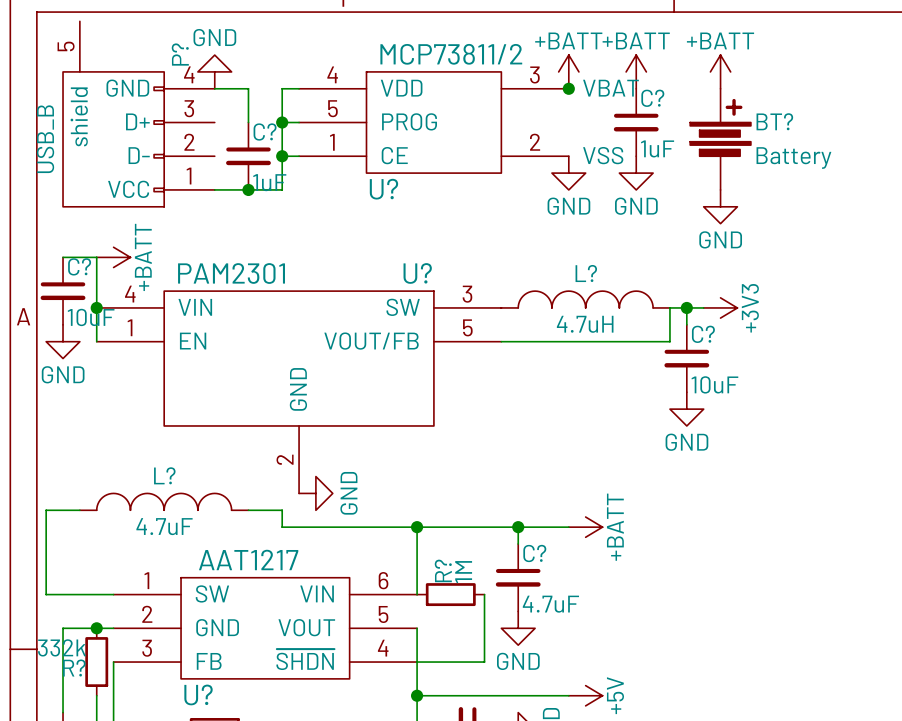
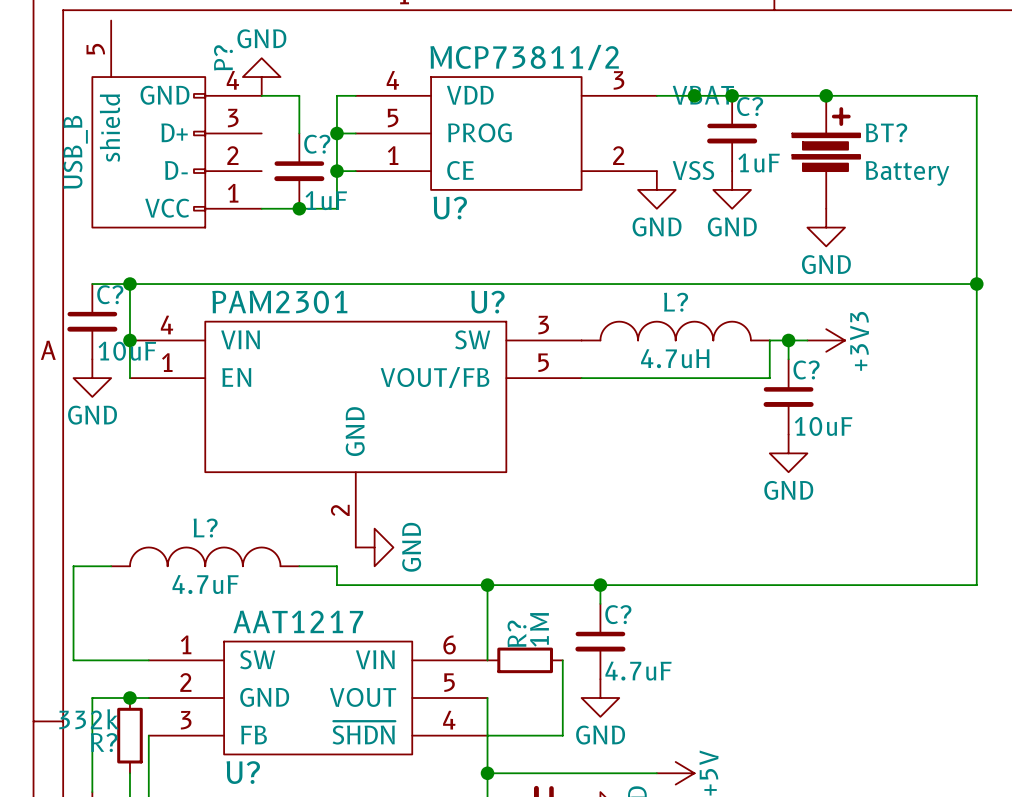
power symbol: +BATT (568, 71) -> none
power symbol: +BATT (636, 71) -> none
power symbol: +BATT (720, 71) -> none
wire: none -> (656, 95) (976, 95) (976, 585) (656, 585)
junction: (568, 88) -> none
junction: none -> (694, 95)
junction: none -> (732, 95)
junction: none -> (826, 95)
wire: none -> (129, 284) (976, 284)
junction: none -> (129, 284)
power symbol: +BATT (113, 257) -> none
junction: none -> (976, 284)
power symbol: +BATT (585, 527) -> none

